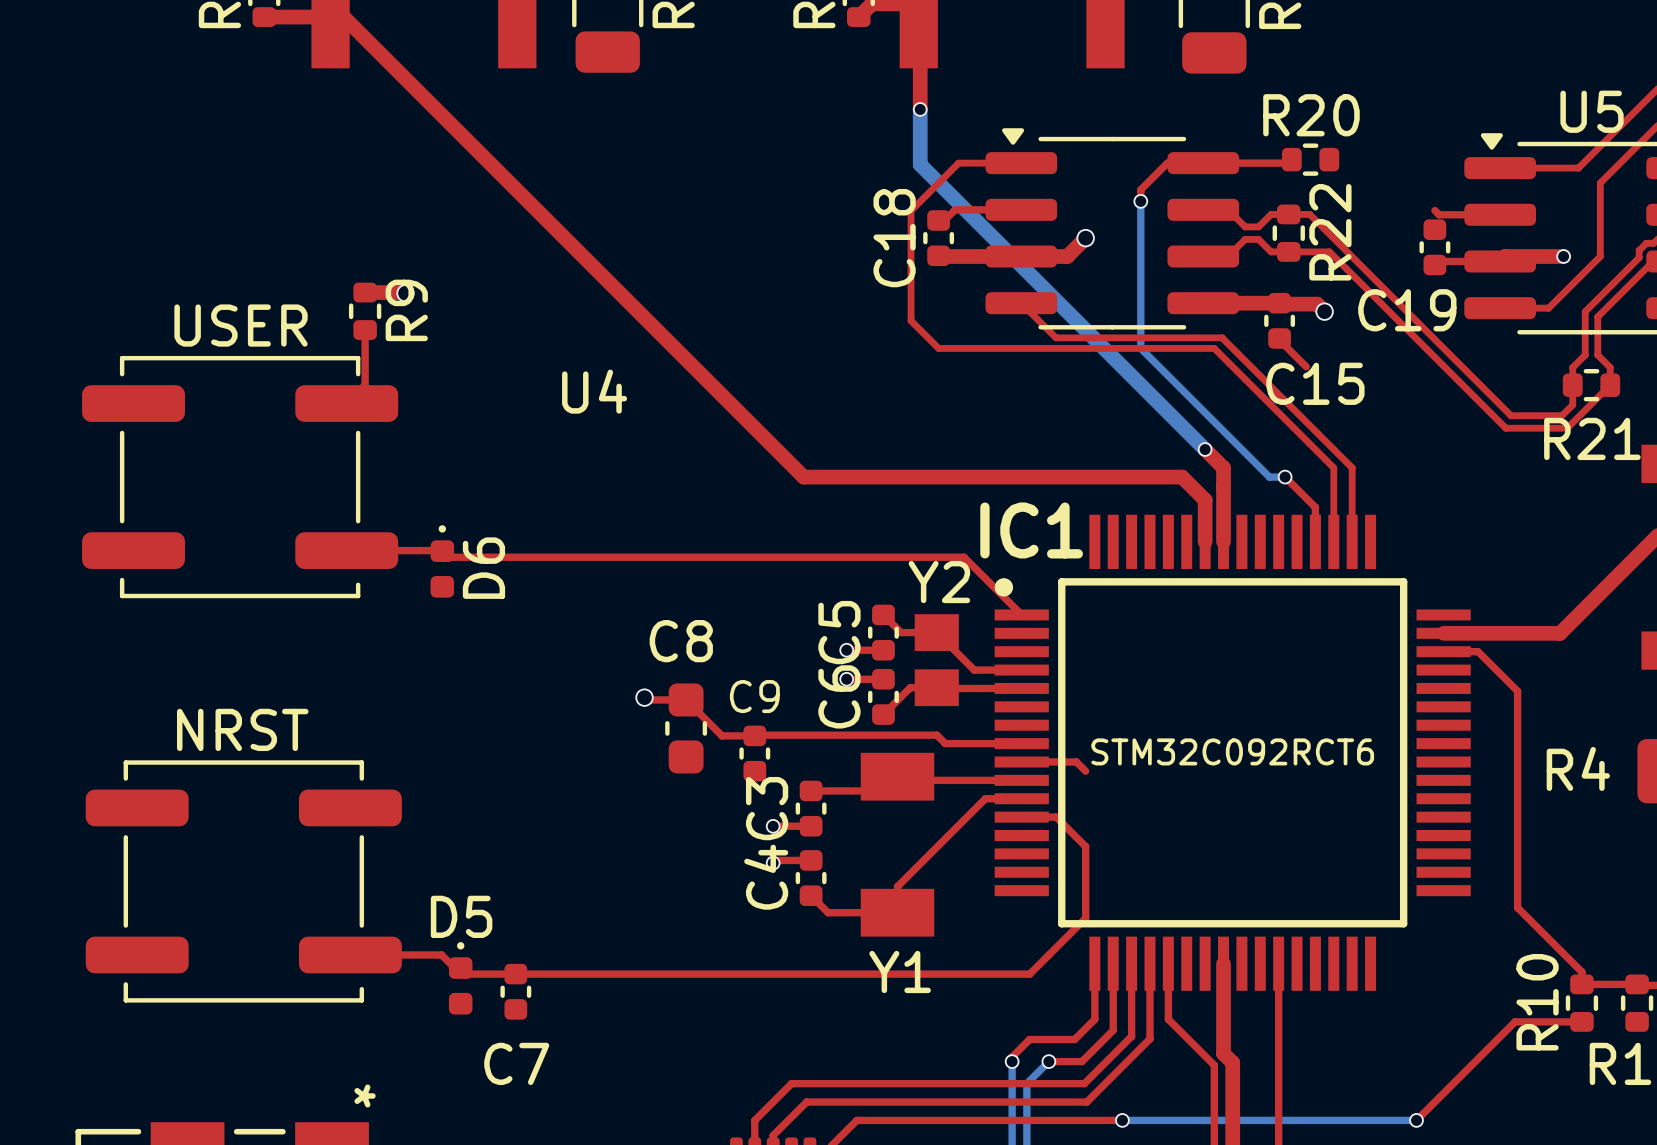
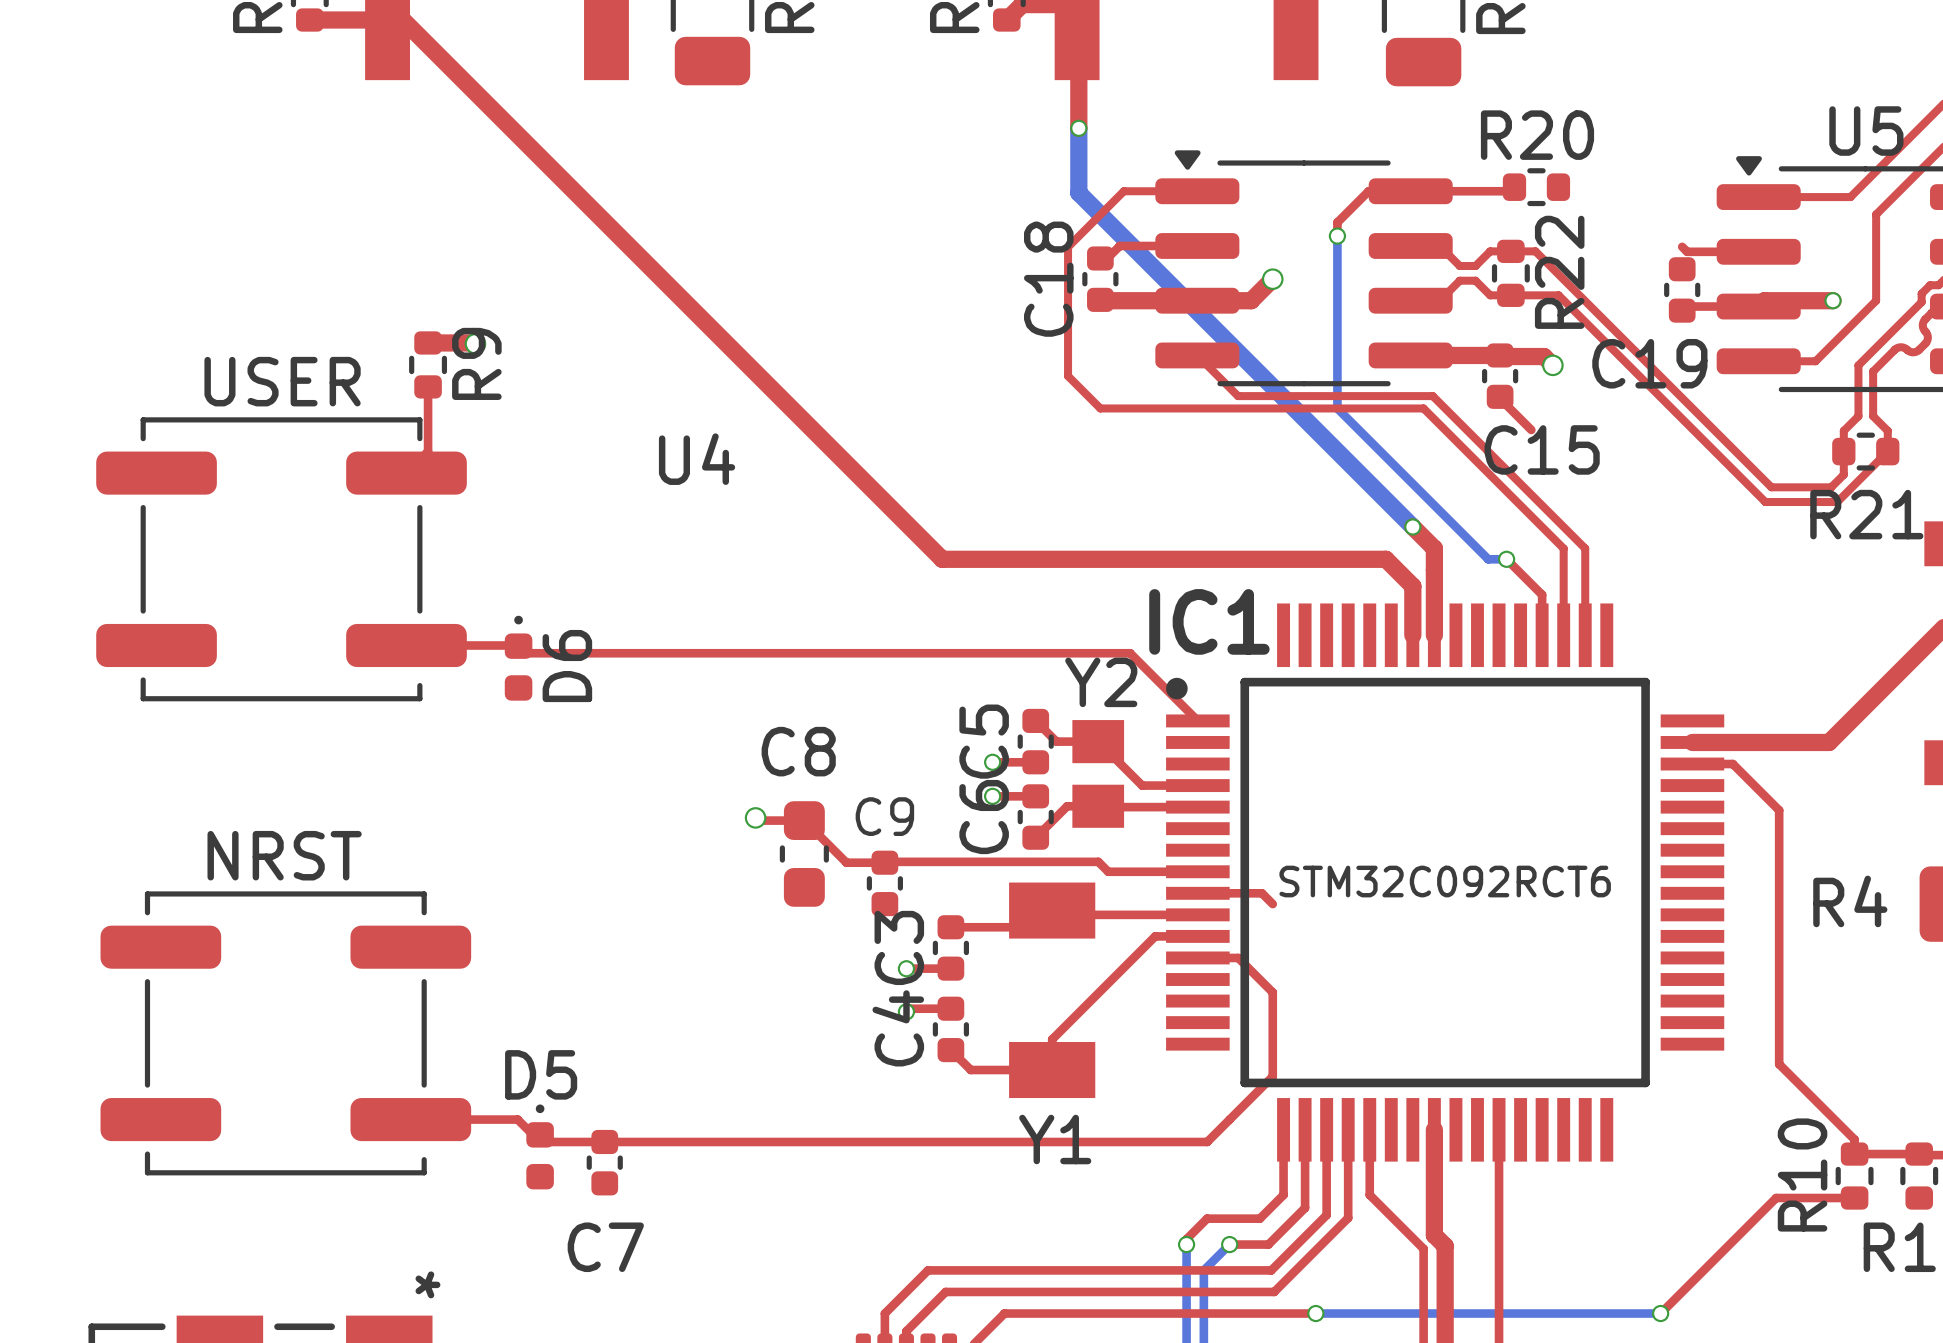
top track: (1642, 272) (1616, 298) -> (1925, 319) (1922, 326) (1927, 339) (1919, 349) (1913, 352) (1902, 347) (1894, 349)

